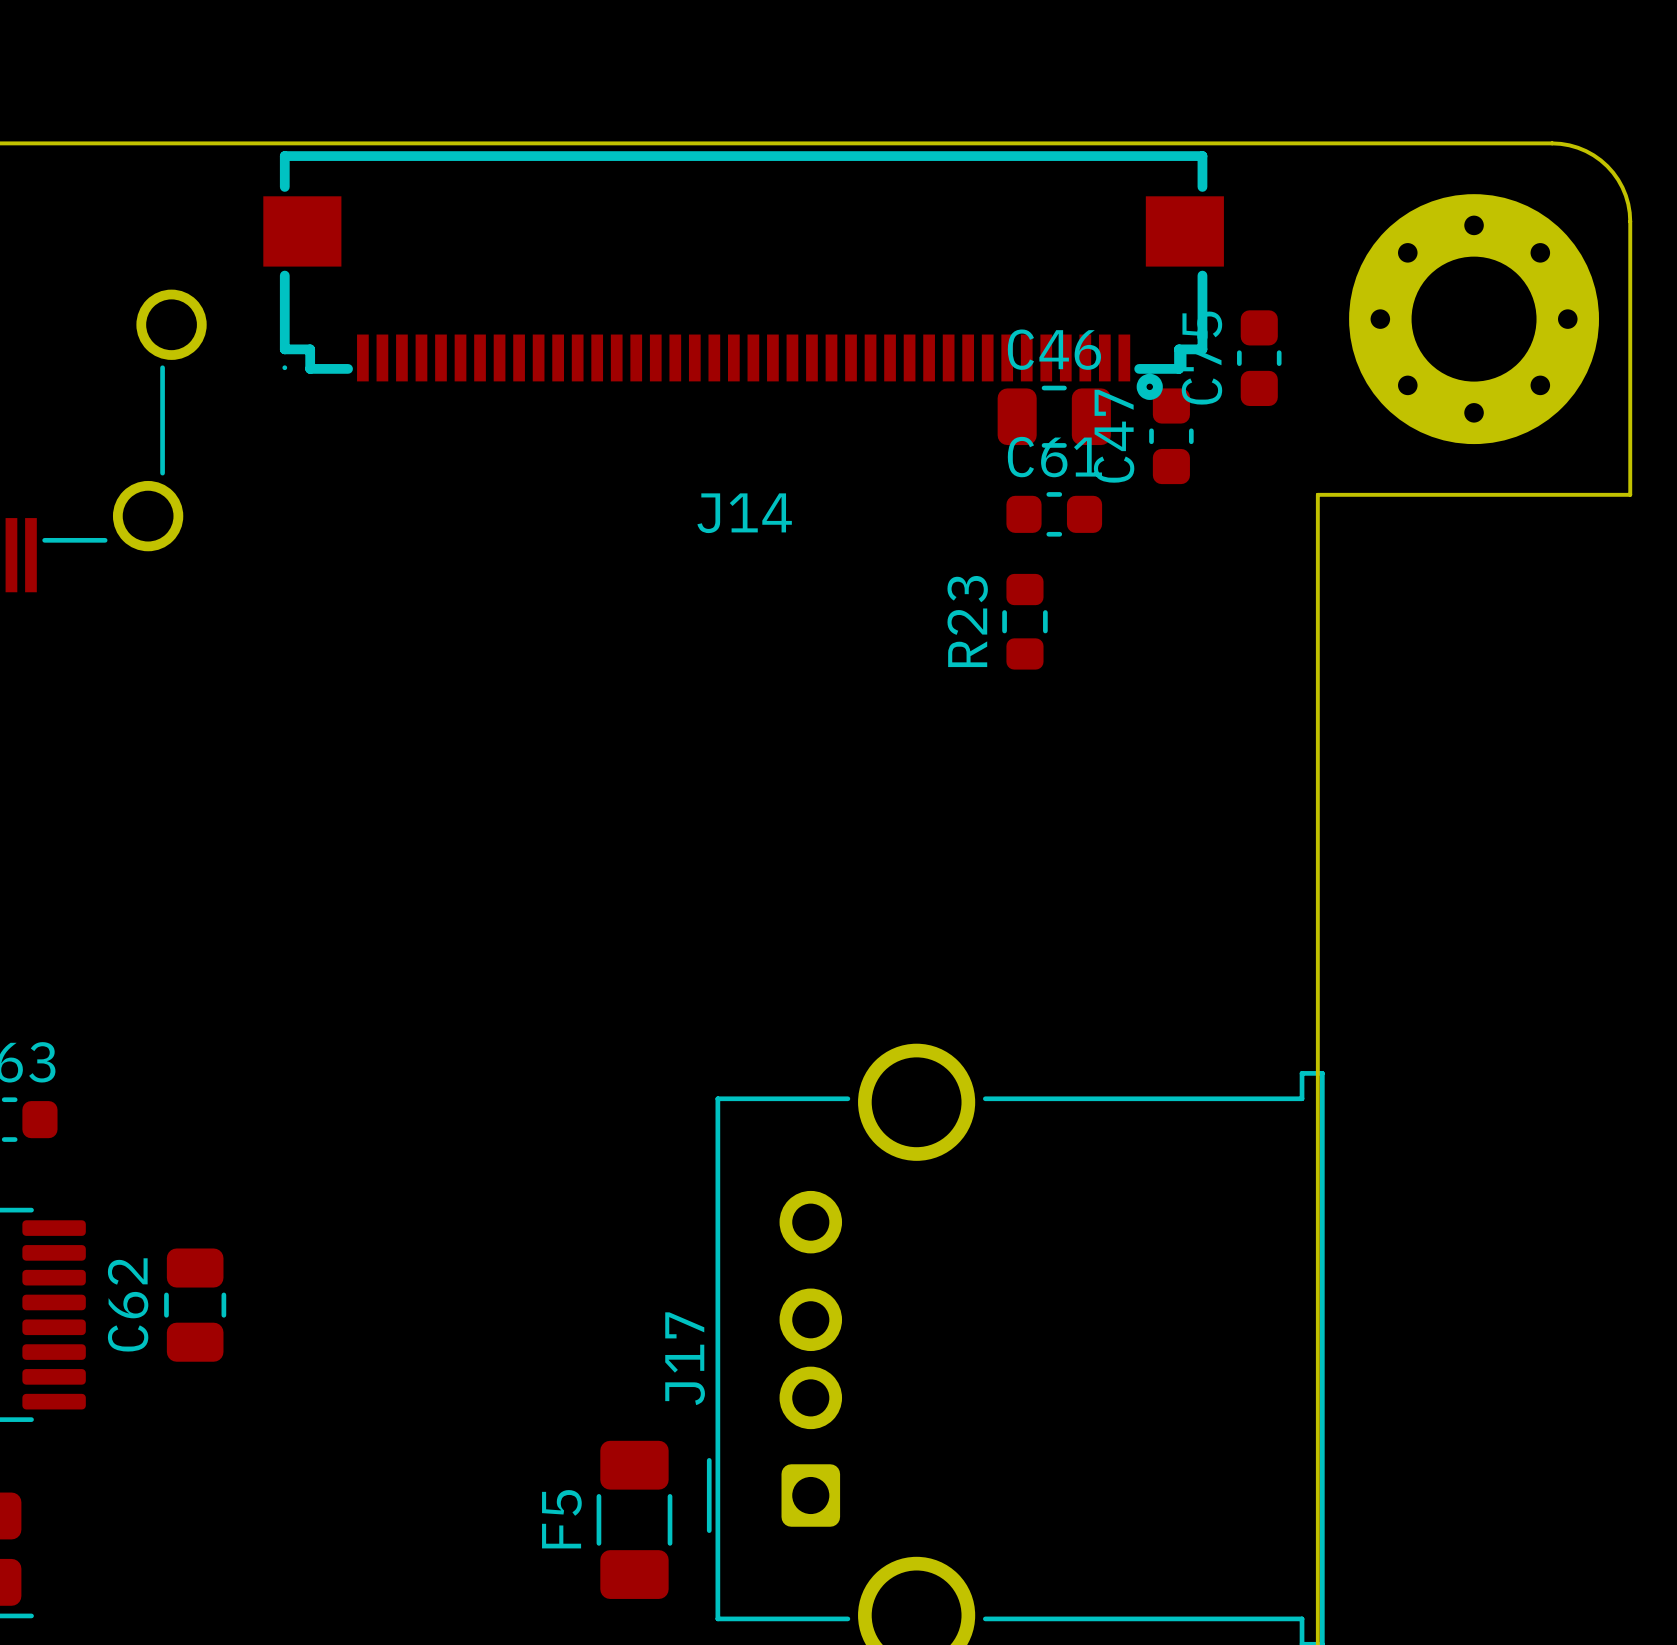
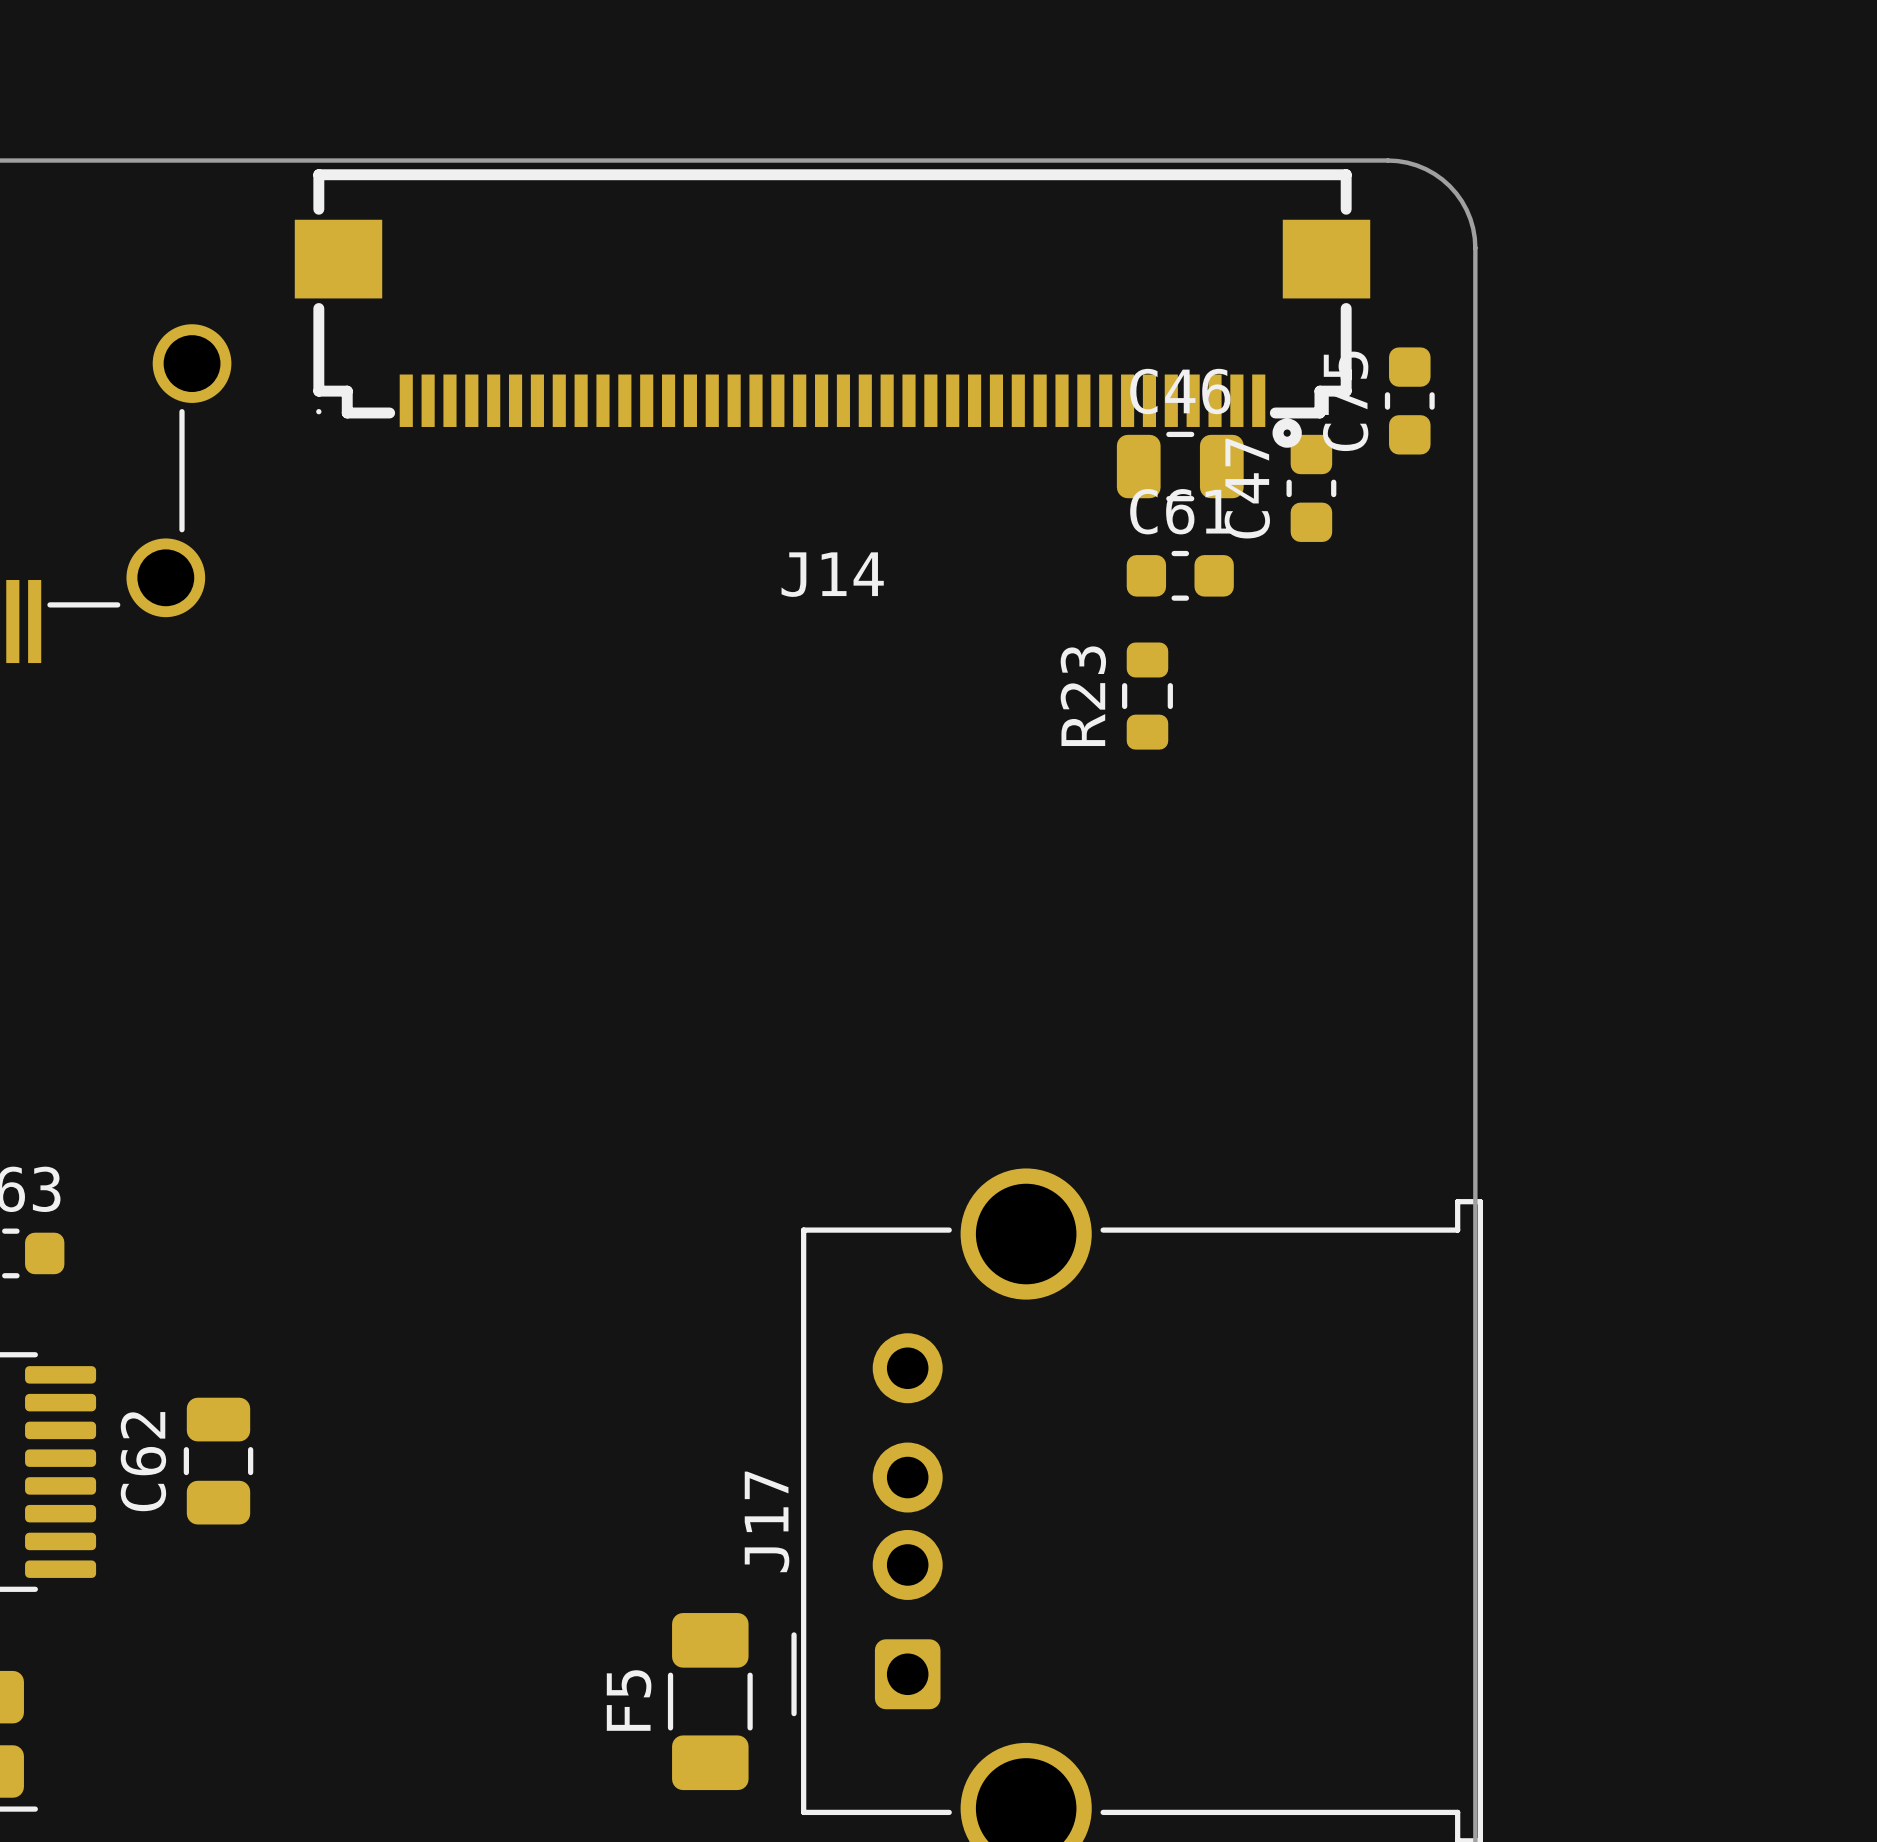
board edge: (1239, 143) (1560, 143) (1577, 147) (1600, 160) (1618, 179) (1628, 204) (1630, 221) (1630, 494) (1317, 494) -> (1387, 160) (1416, 165) (1442, 179) (1461, 201) (1473, 228) (1475, 247) (1475, 553)
part: (1474, 319) -> none

